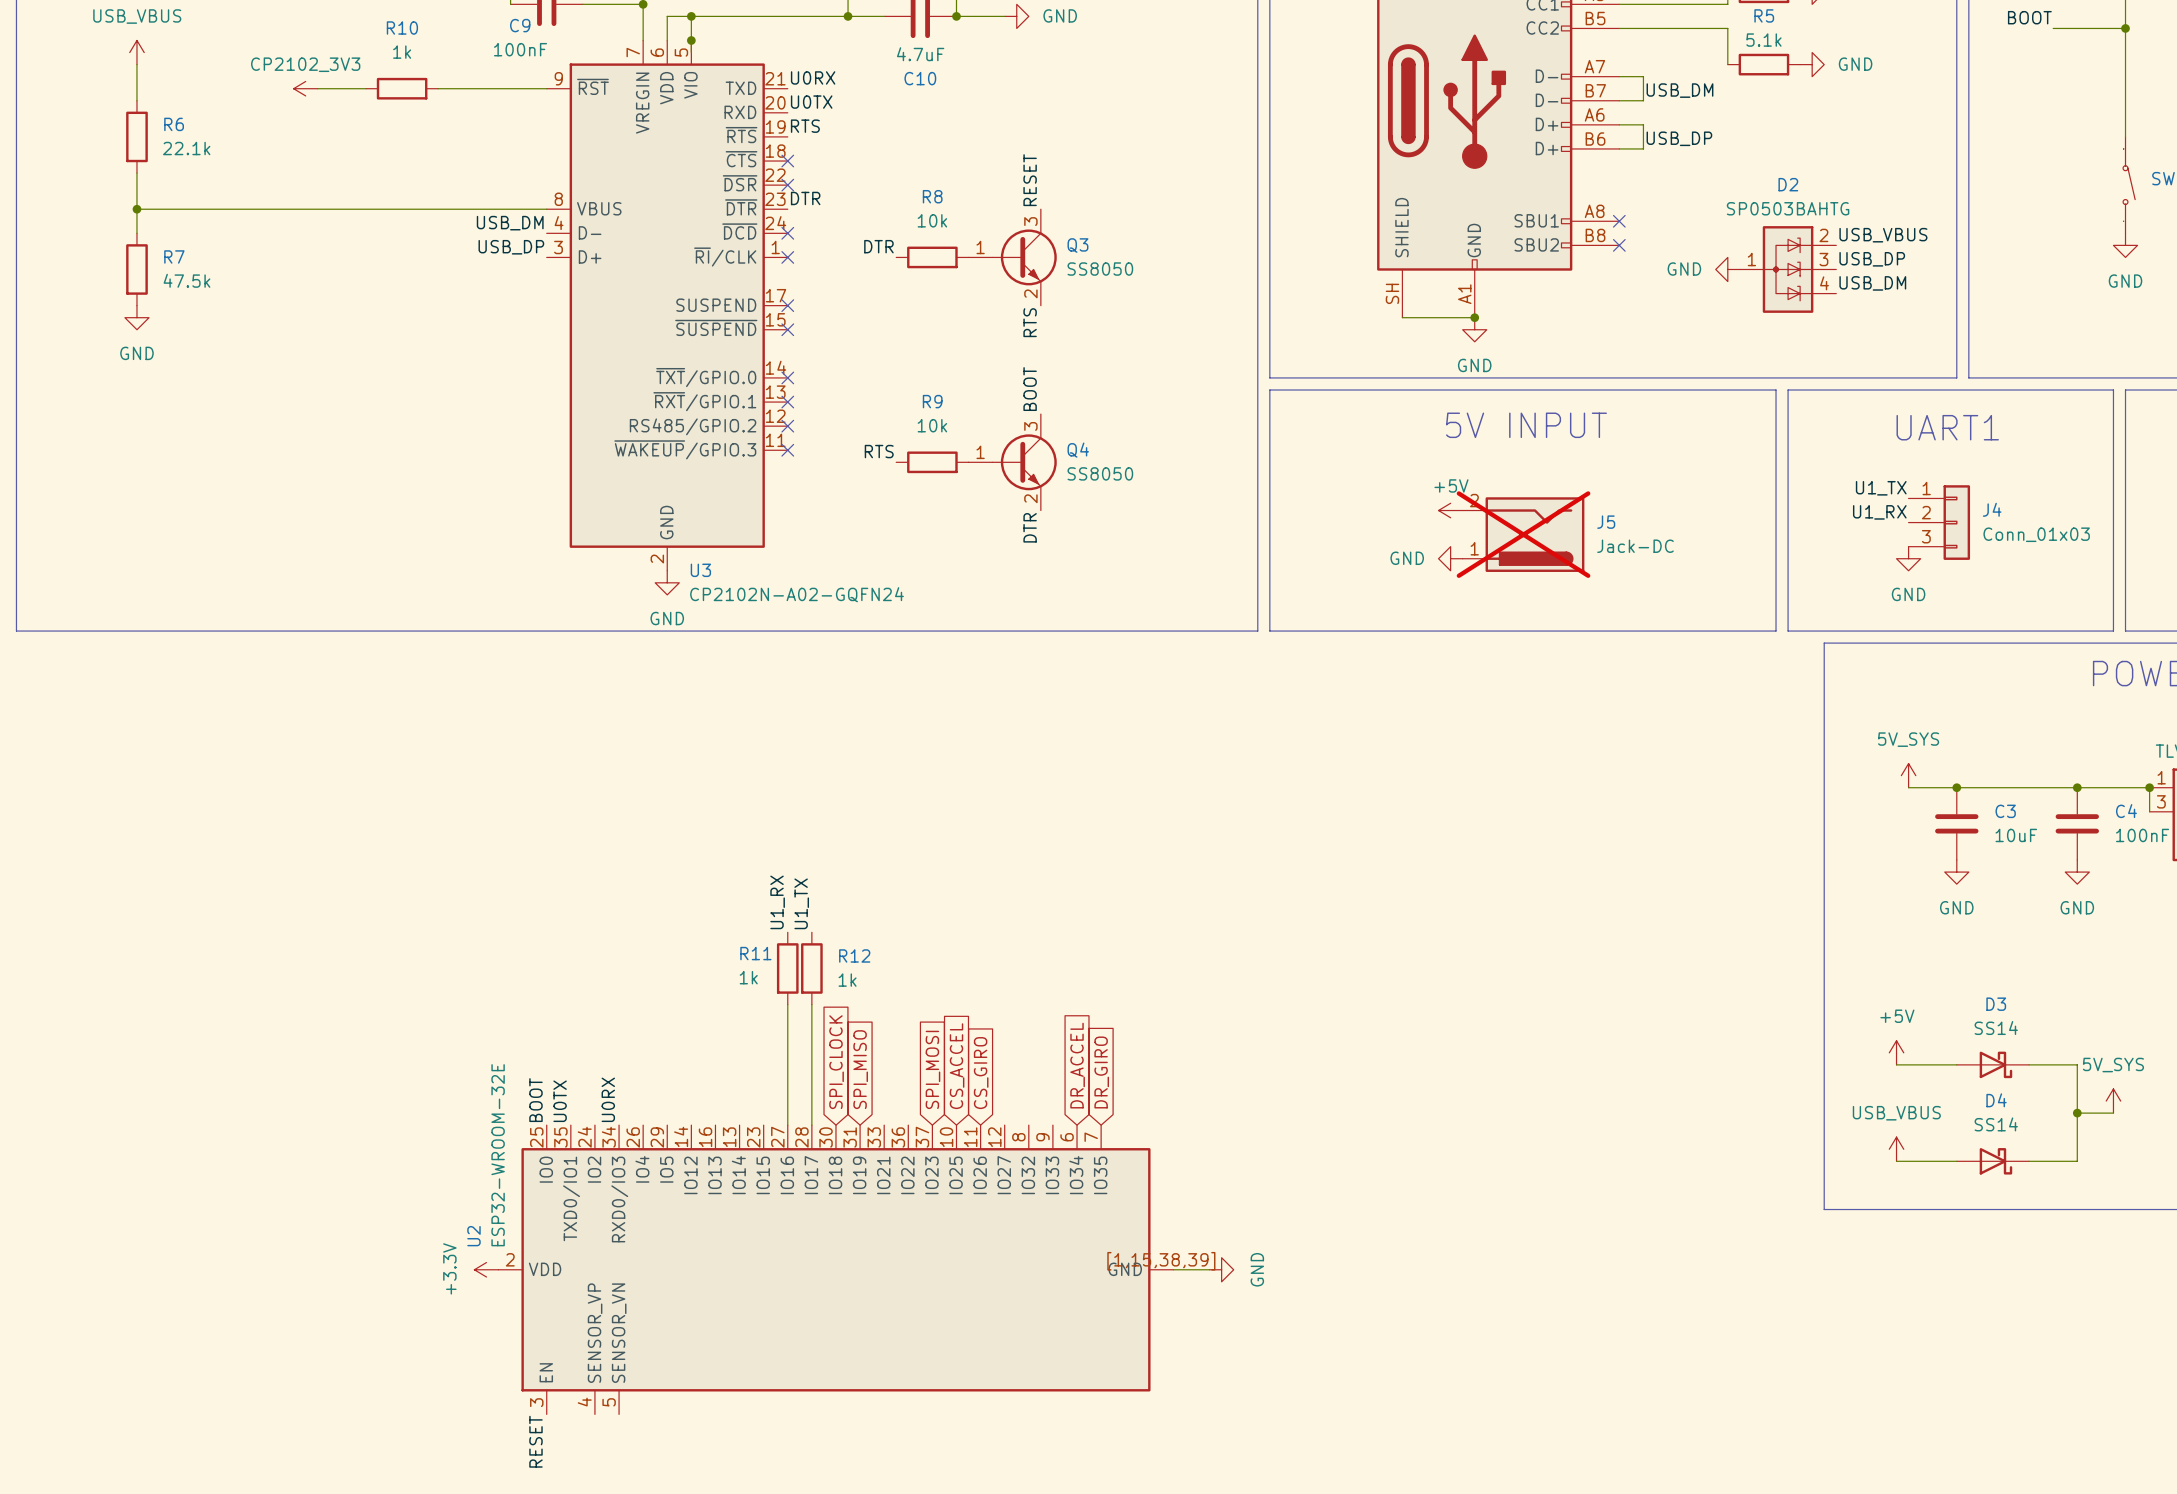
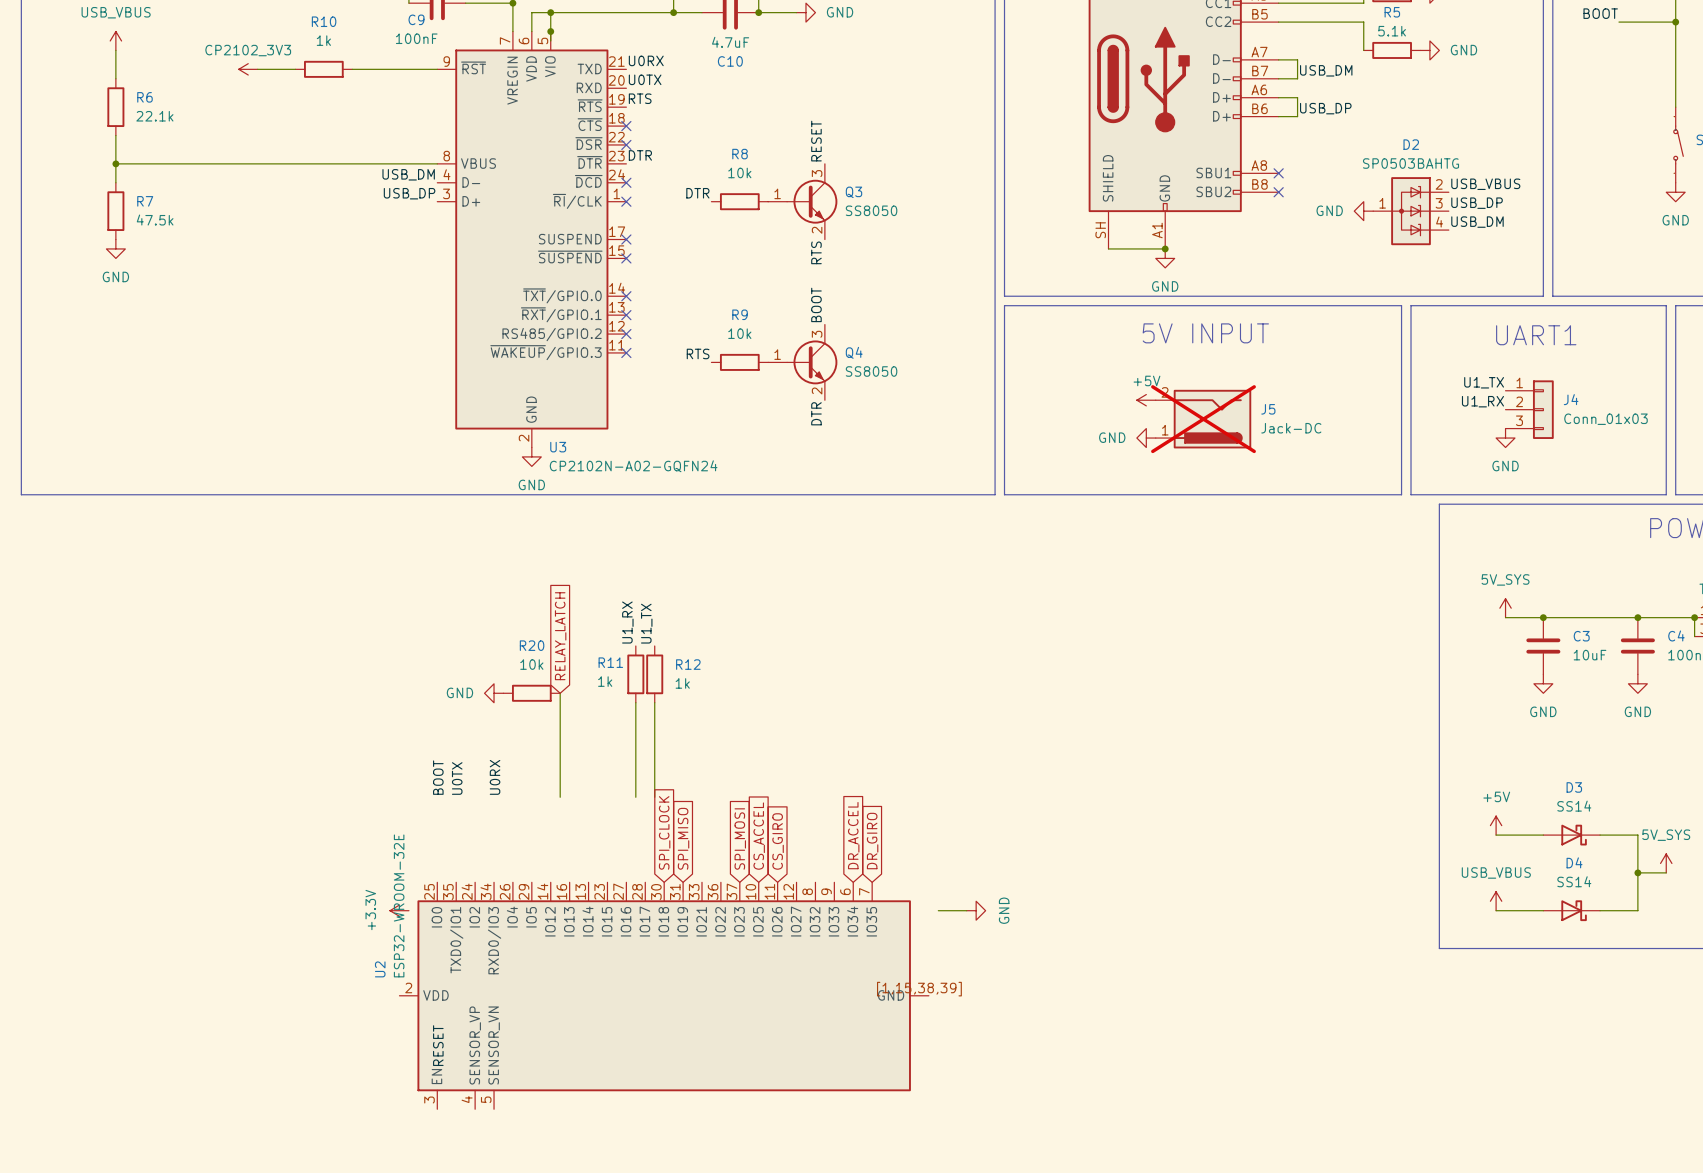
global label: none -> RELAY_LATCH (560, 636)
power symbol: none -> GND (494, 693)
R20: none -> 10k (531, 693)
wire: none -> (560, 693) (560, 797)
label position: U1_RX (777, 902) -> U1_RX (627, 622)
label position: U1_TX (801, 903) -> U1_TX (646, 623)
R11 position: (787, 968) -> (635, 674)
R12 position: (811, 968) -> (654, 674)
wire: (787, 1004) (787, 1125) -> (635, 702) (635, 797)
wire: (811, 1004) (811, 1125) -> (654, 702) (654, 797)
label position: U0RX (608, 1099) -> U0RX (495, 777)
label position: BOOT (535, 1100) -> BOOT (438, 777)
label position: U0TX (560, 1101) -> U0TX (457, 778)
power symbol position: +3.3V (486, 1269) -> +3.3V (399, 910)
wire: (1173, 1269) (1209, 1269) -> (938, 910) (966, 910)
power symbol position: GND (1221, 1269) -> GND (976, 910)
label position: RESET (535, 1441) -> RESET (438, 1045)

